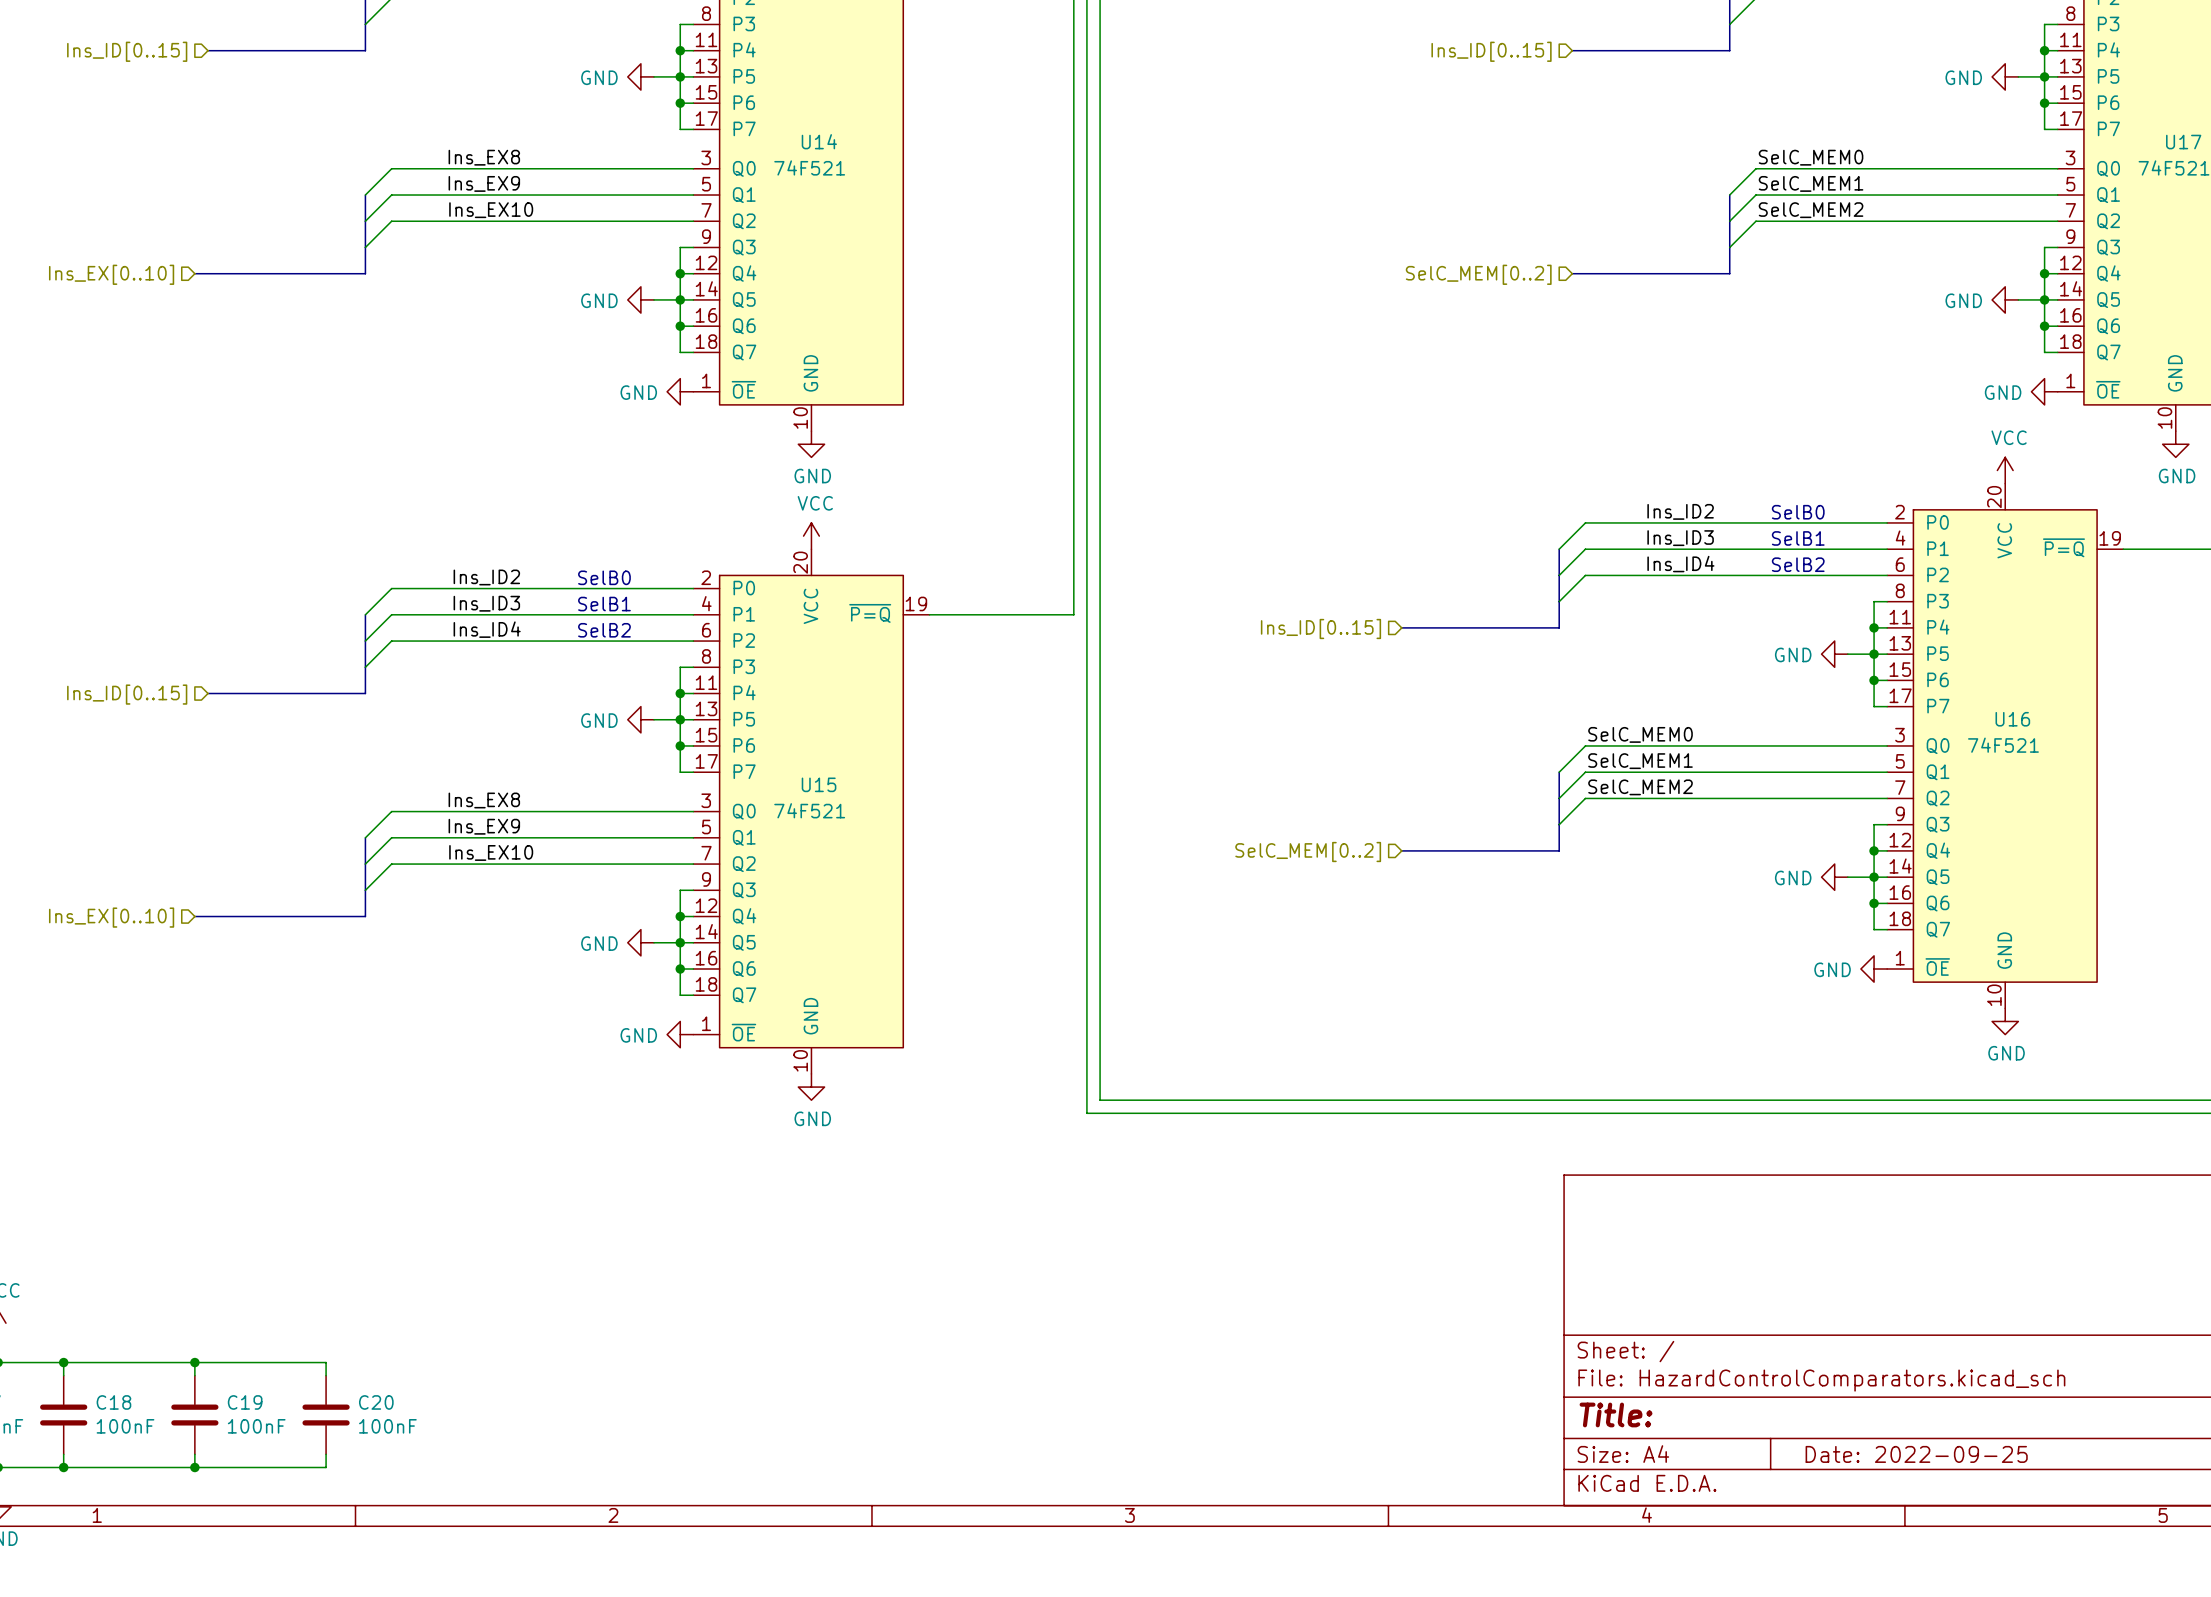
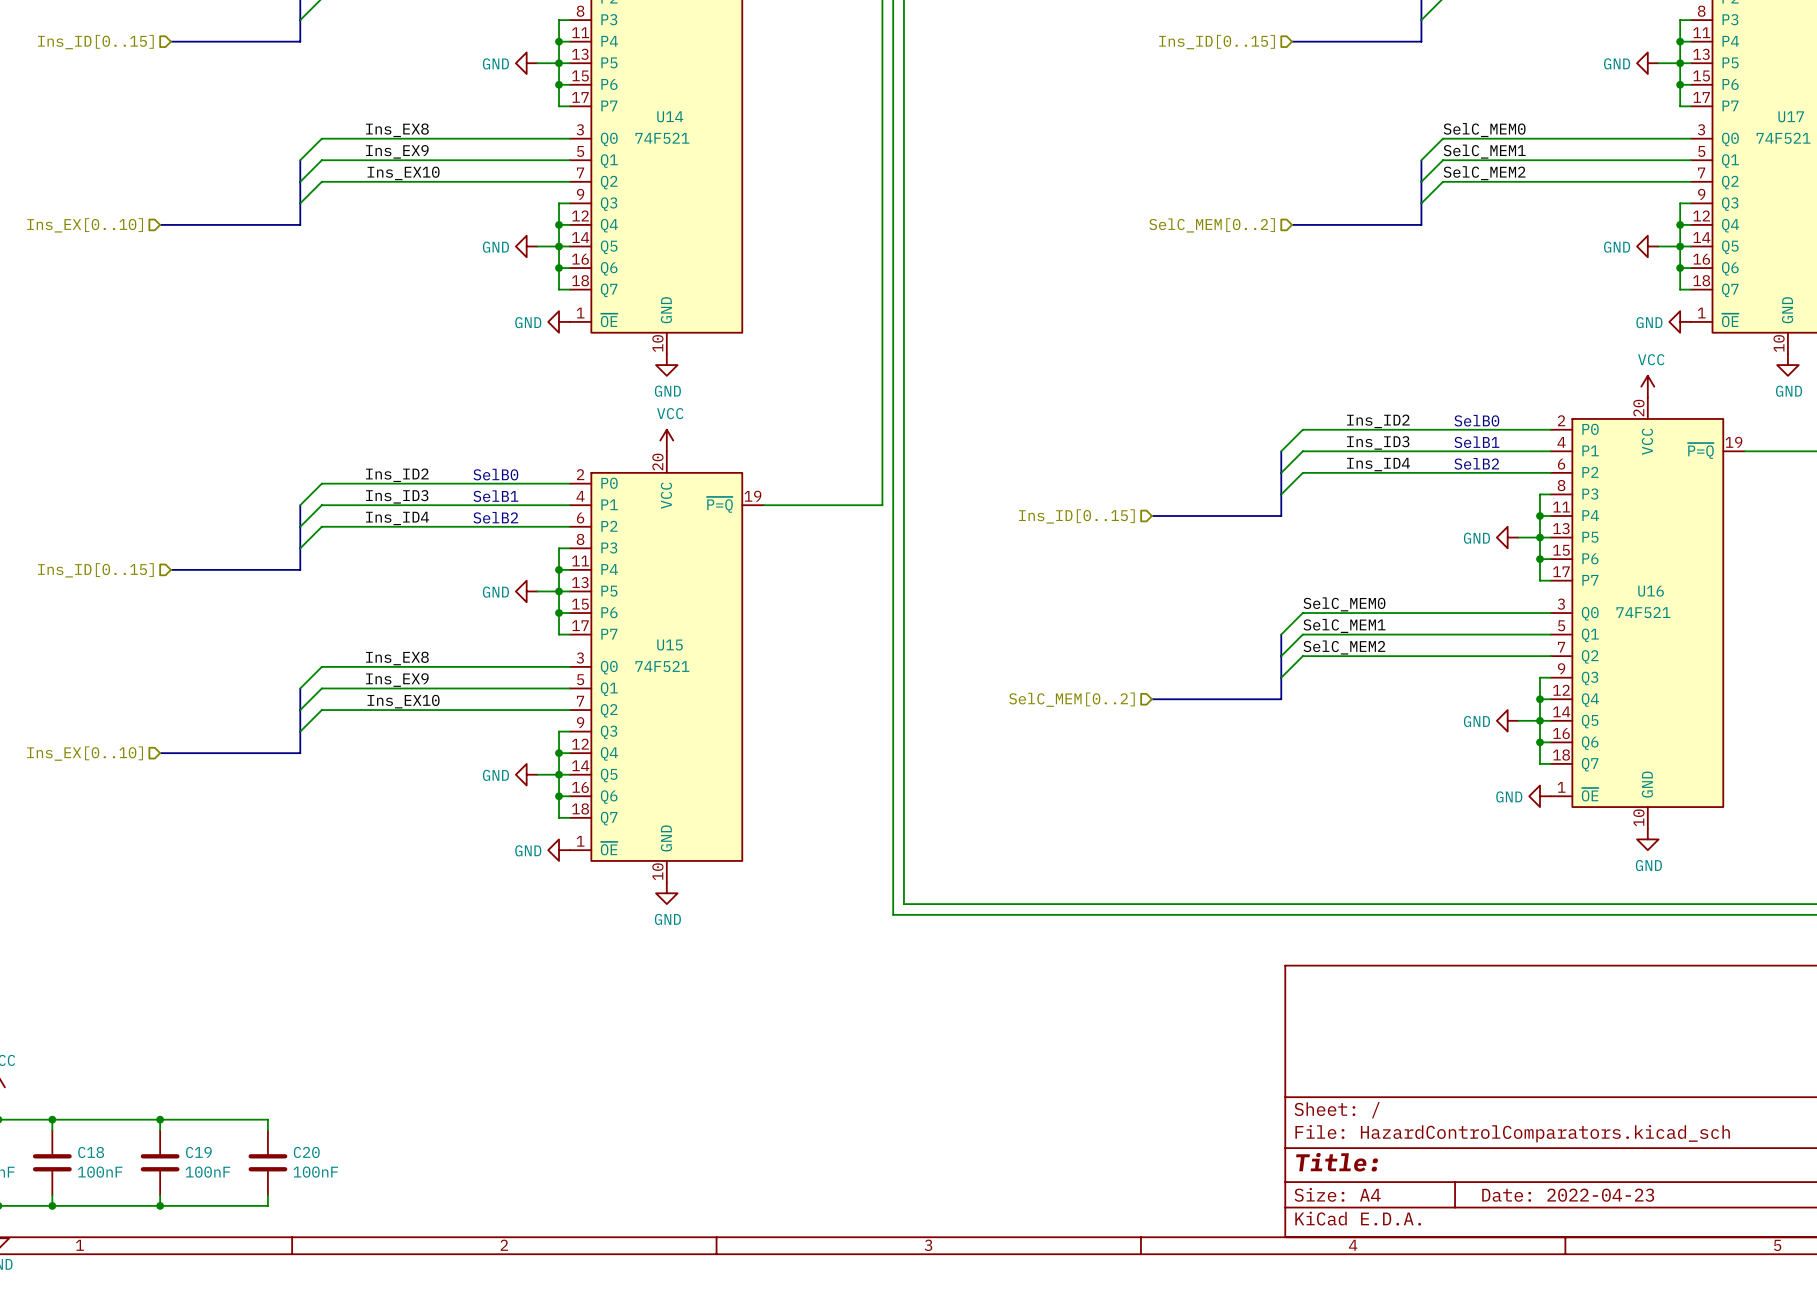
title block: Date: 2022-09-25 (1916, 1454) -> Date: 2022-04-23 (1568, 1195)

